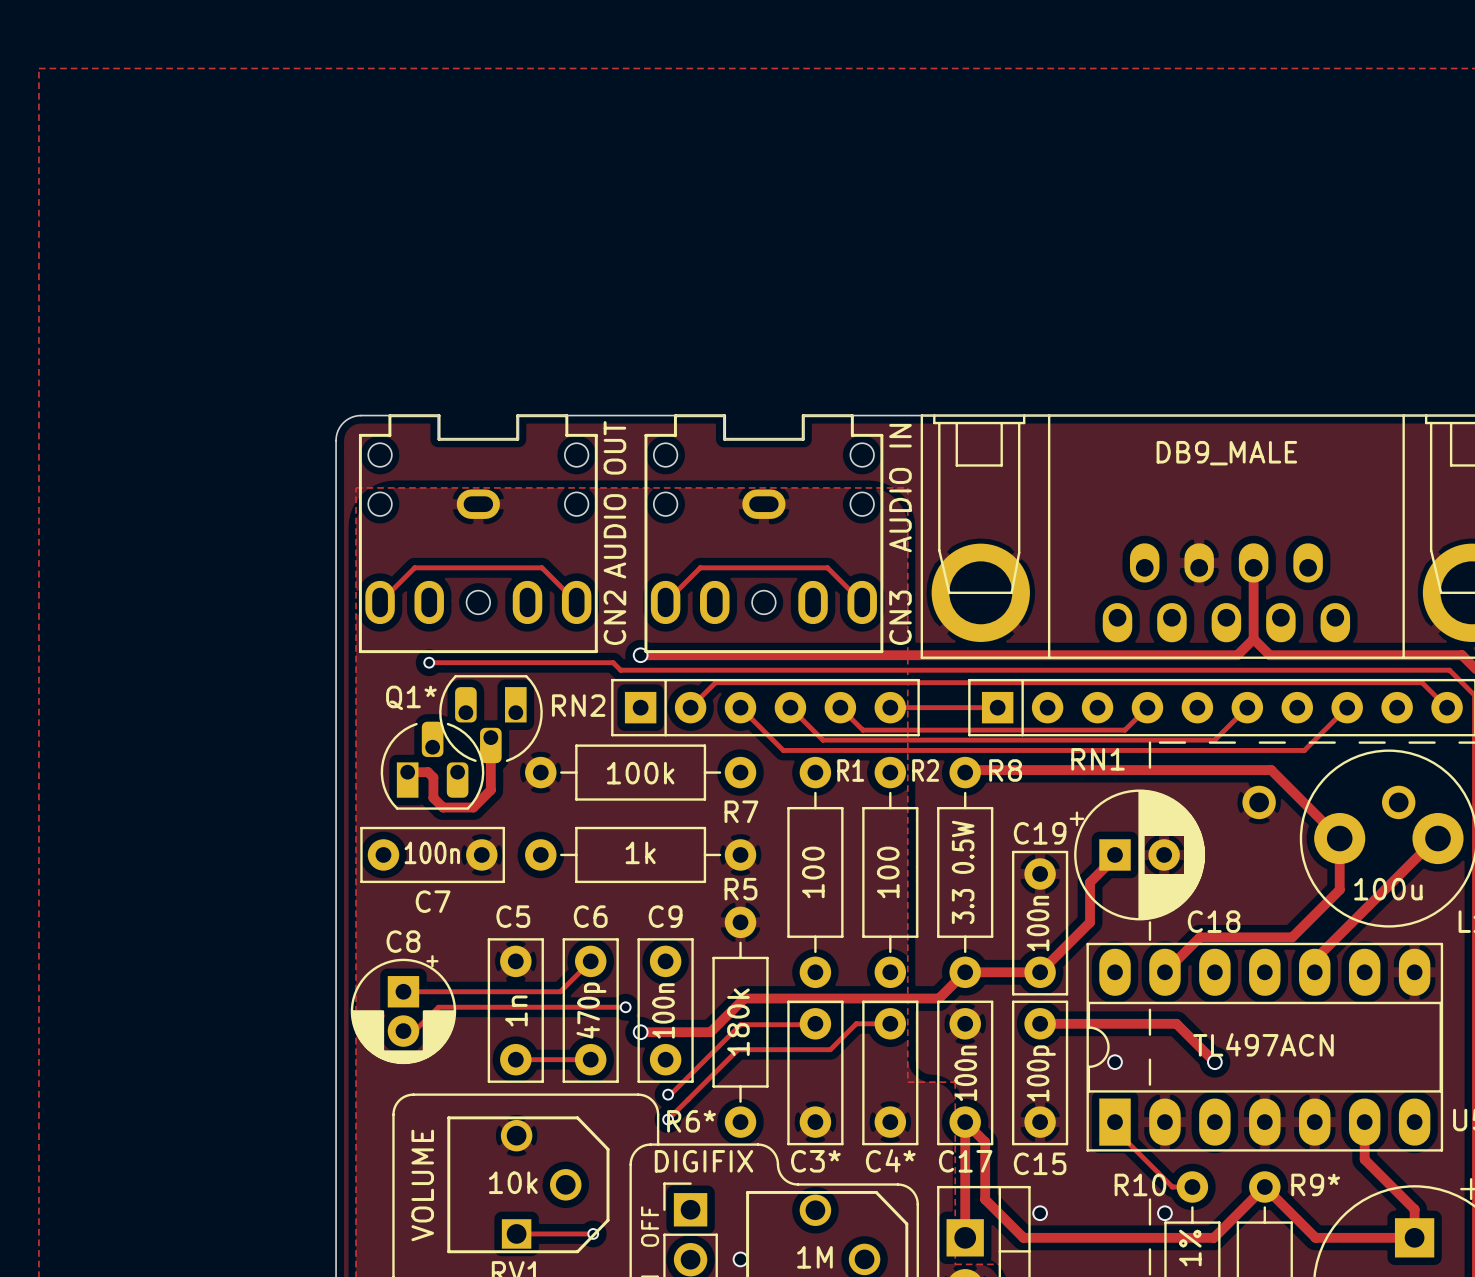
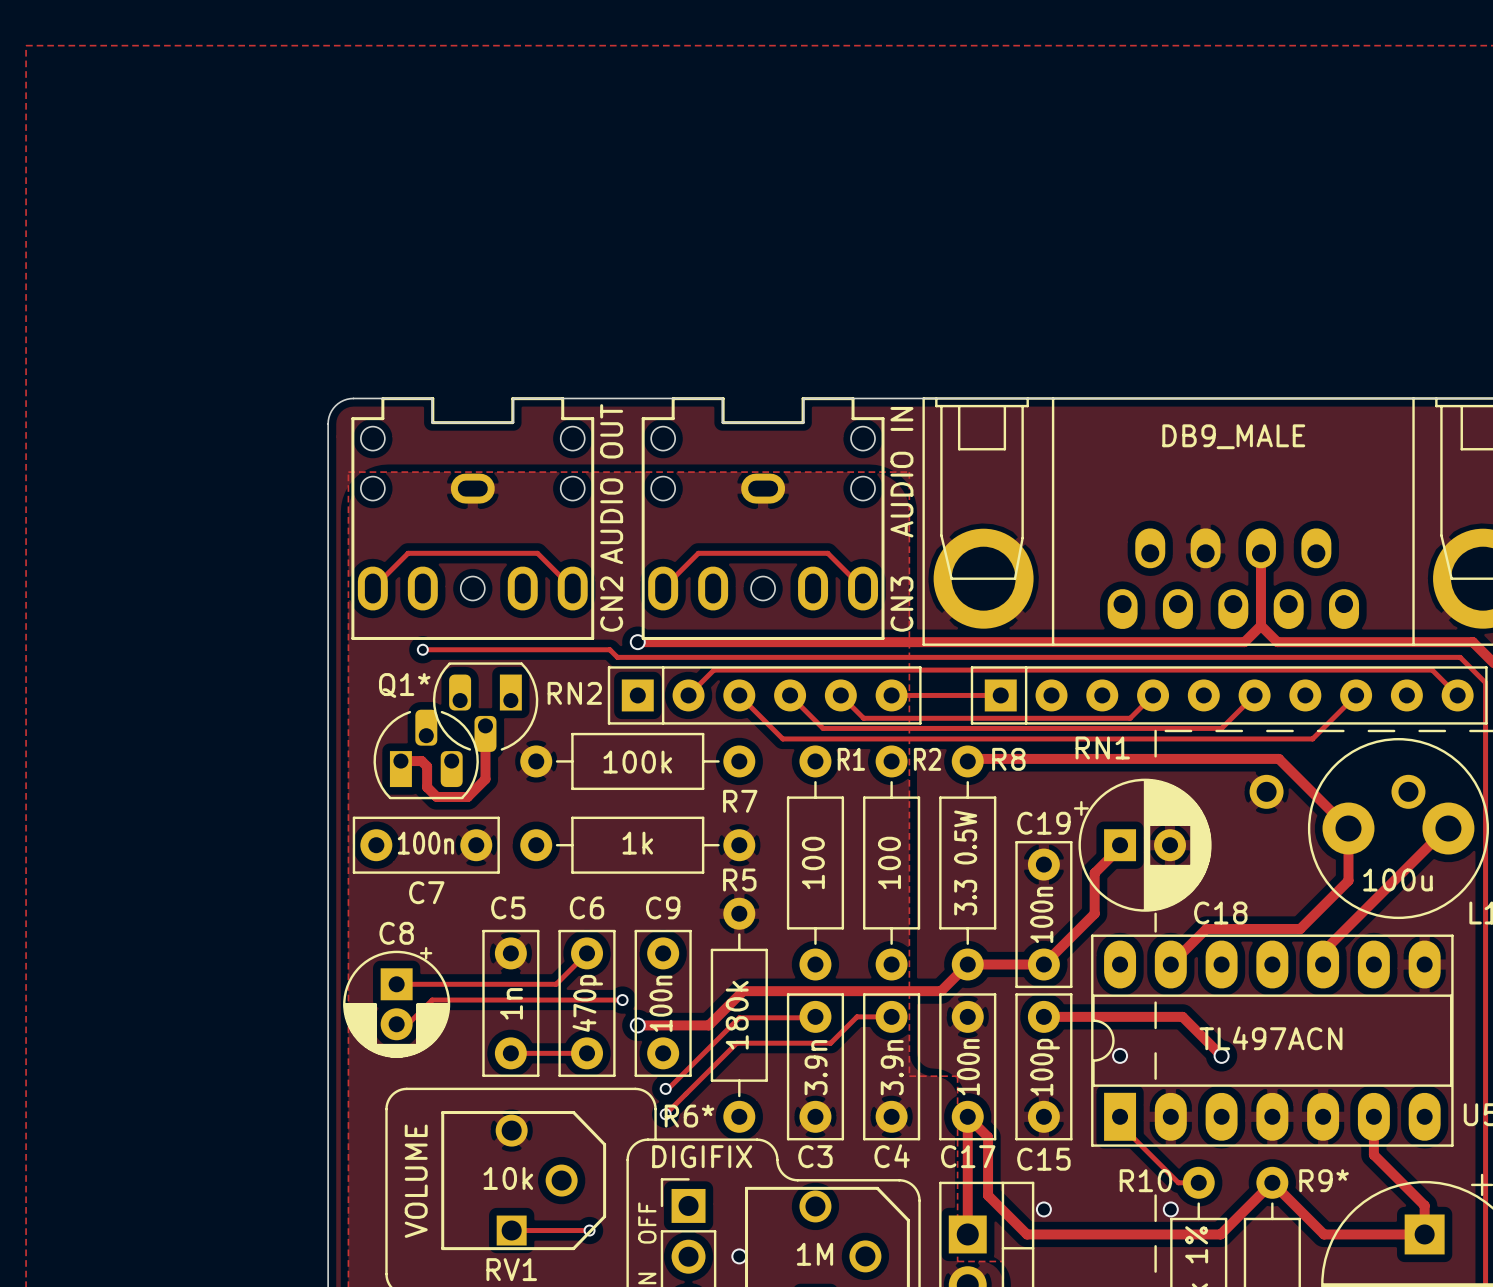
C3 value: none -> 3.9n (816, 1067)
C4 value: none -> 3.9n (892, 1067)
C4 name: none -> C4 (892, 1156)
text: C4* (890, 1160) -> none
C3 name: none -> C3 (815, 1156)
text: C3* (815, 1161) -> none

